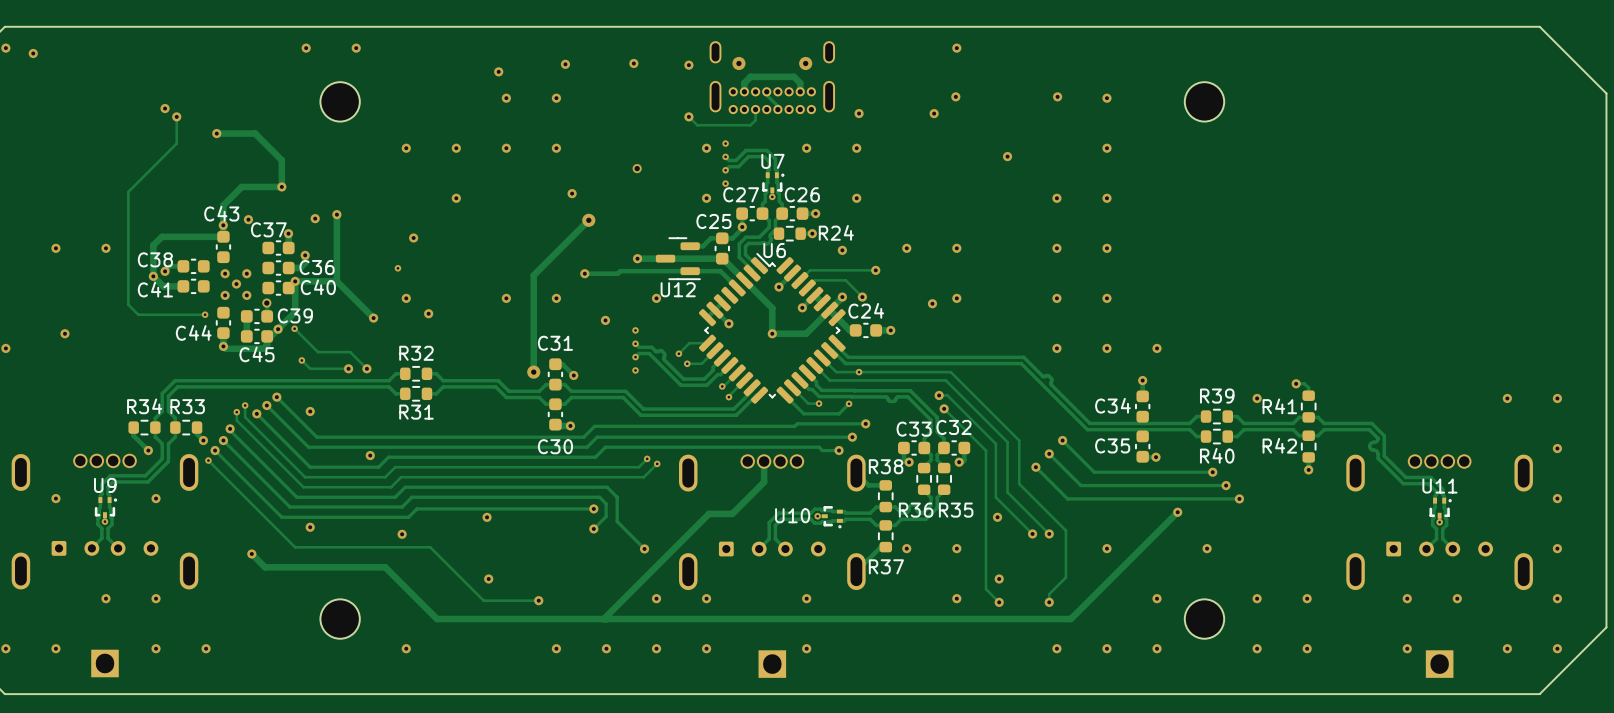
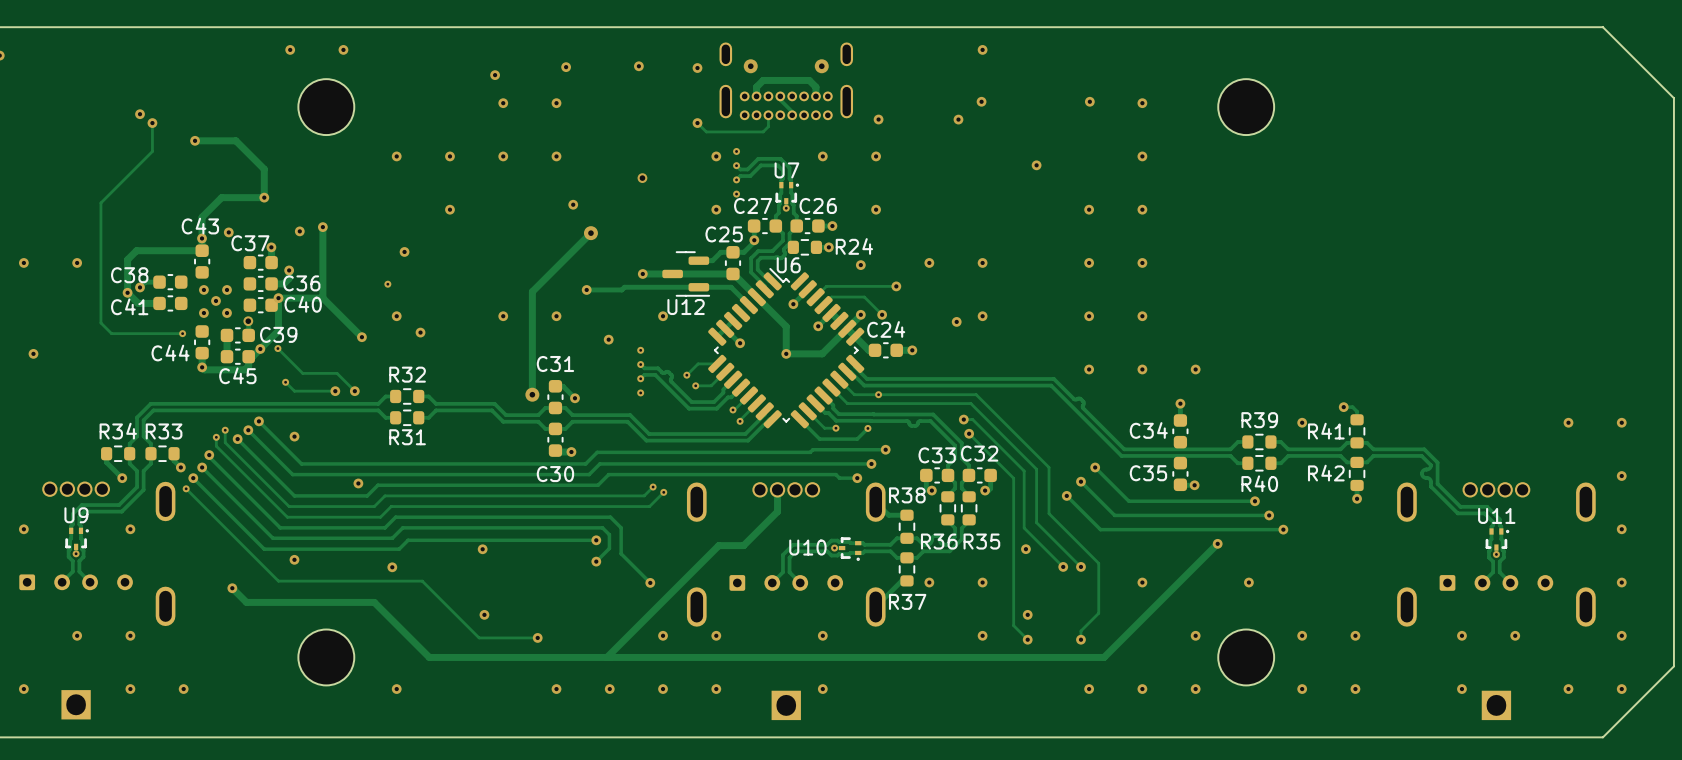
part footprint: [320, 82, 360, 122] -> [298, 79, 355, 136]
part footprint: [1184, 82, 1225, 122] -> [1218, 79, 1275, 136]
part footprint: [320, 599, 360, 639] -> [298, 629, 355, 686]
part footprint: [1184, 599, 1225, 639] -> [1218, 629, 1275, 686]

